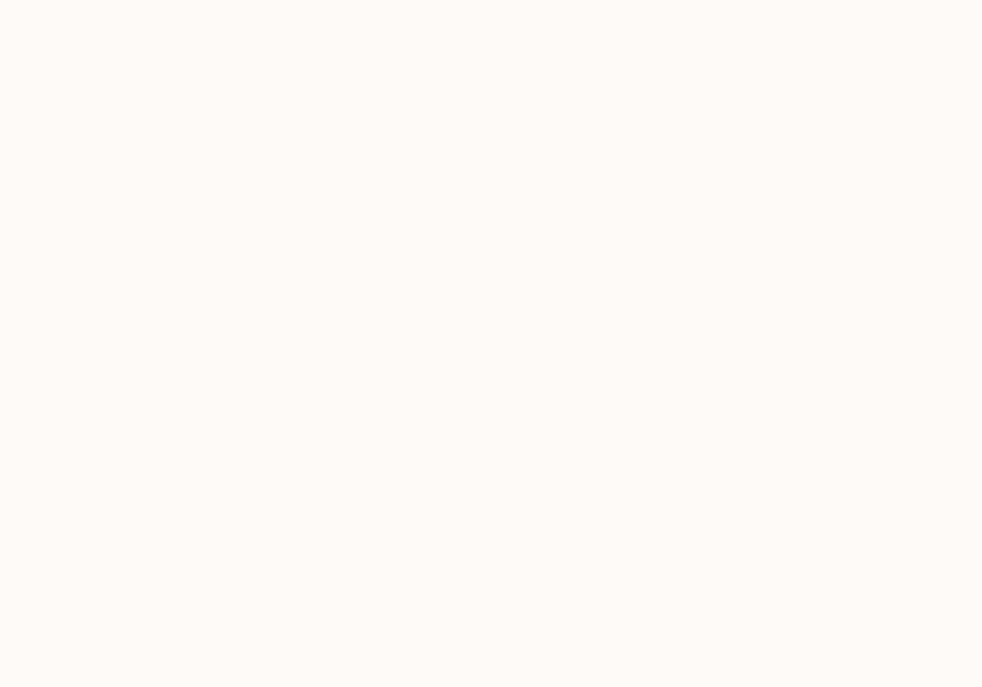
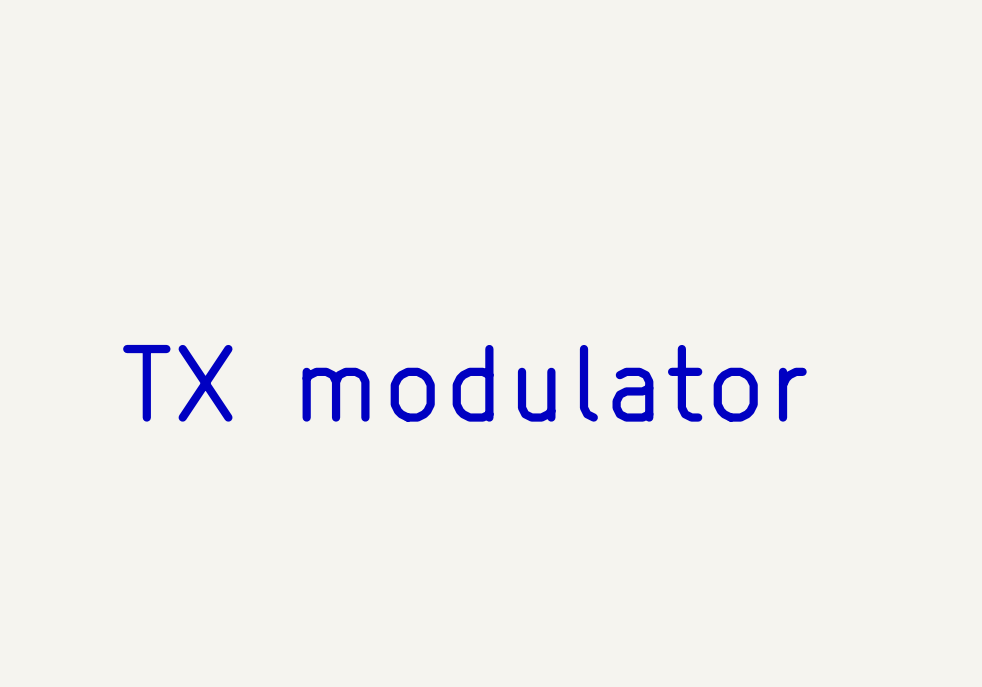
text: none -> TX modulator (464, 383)

